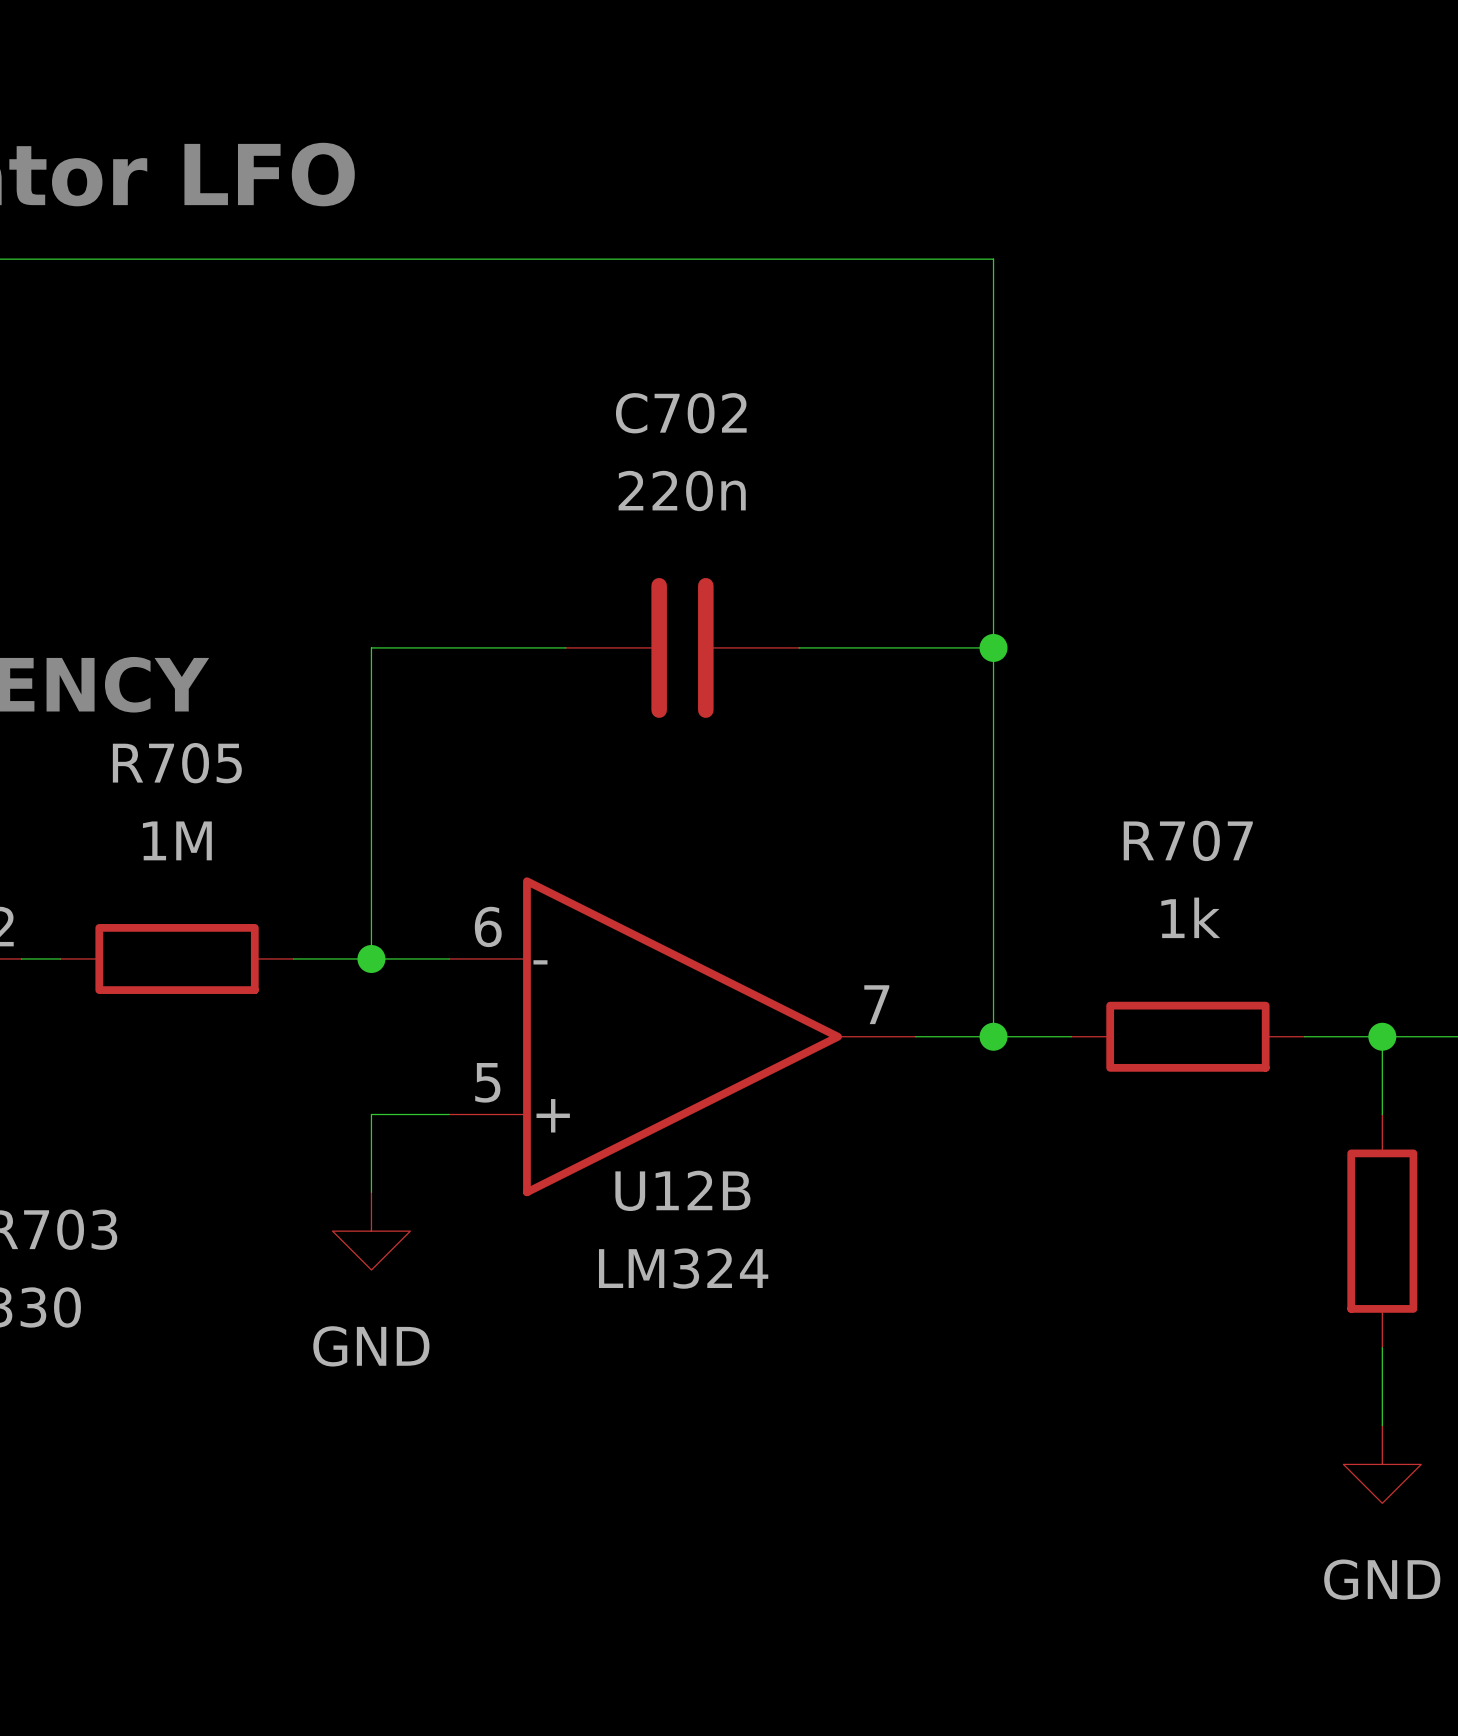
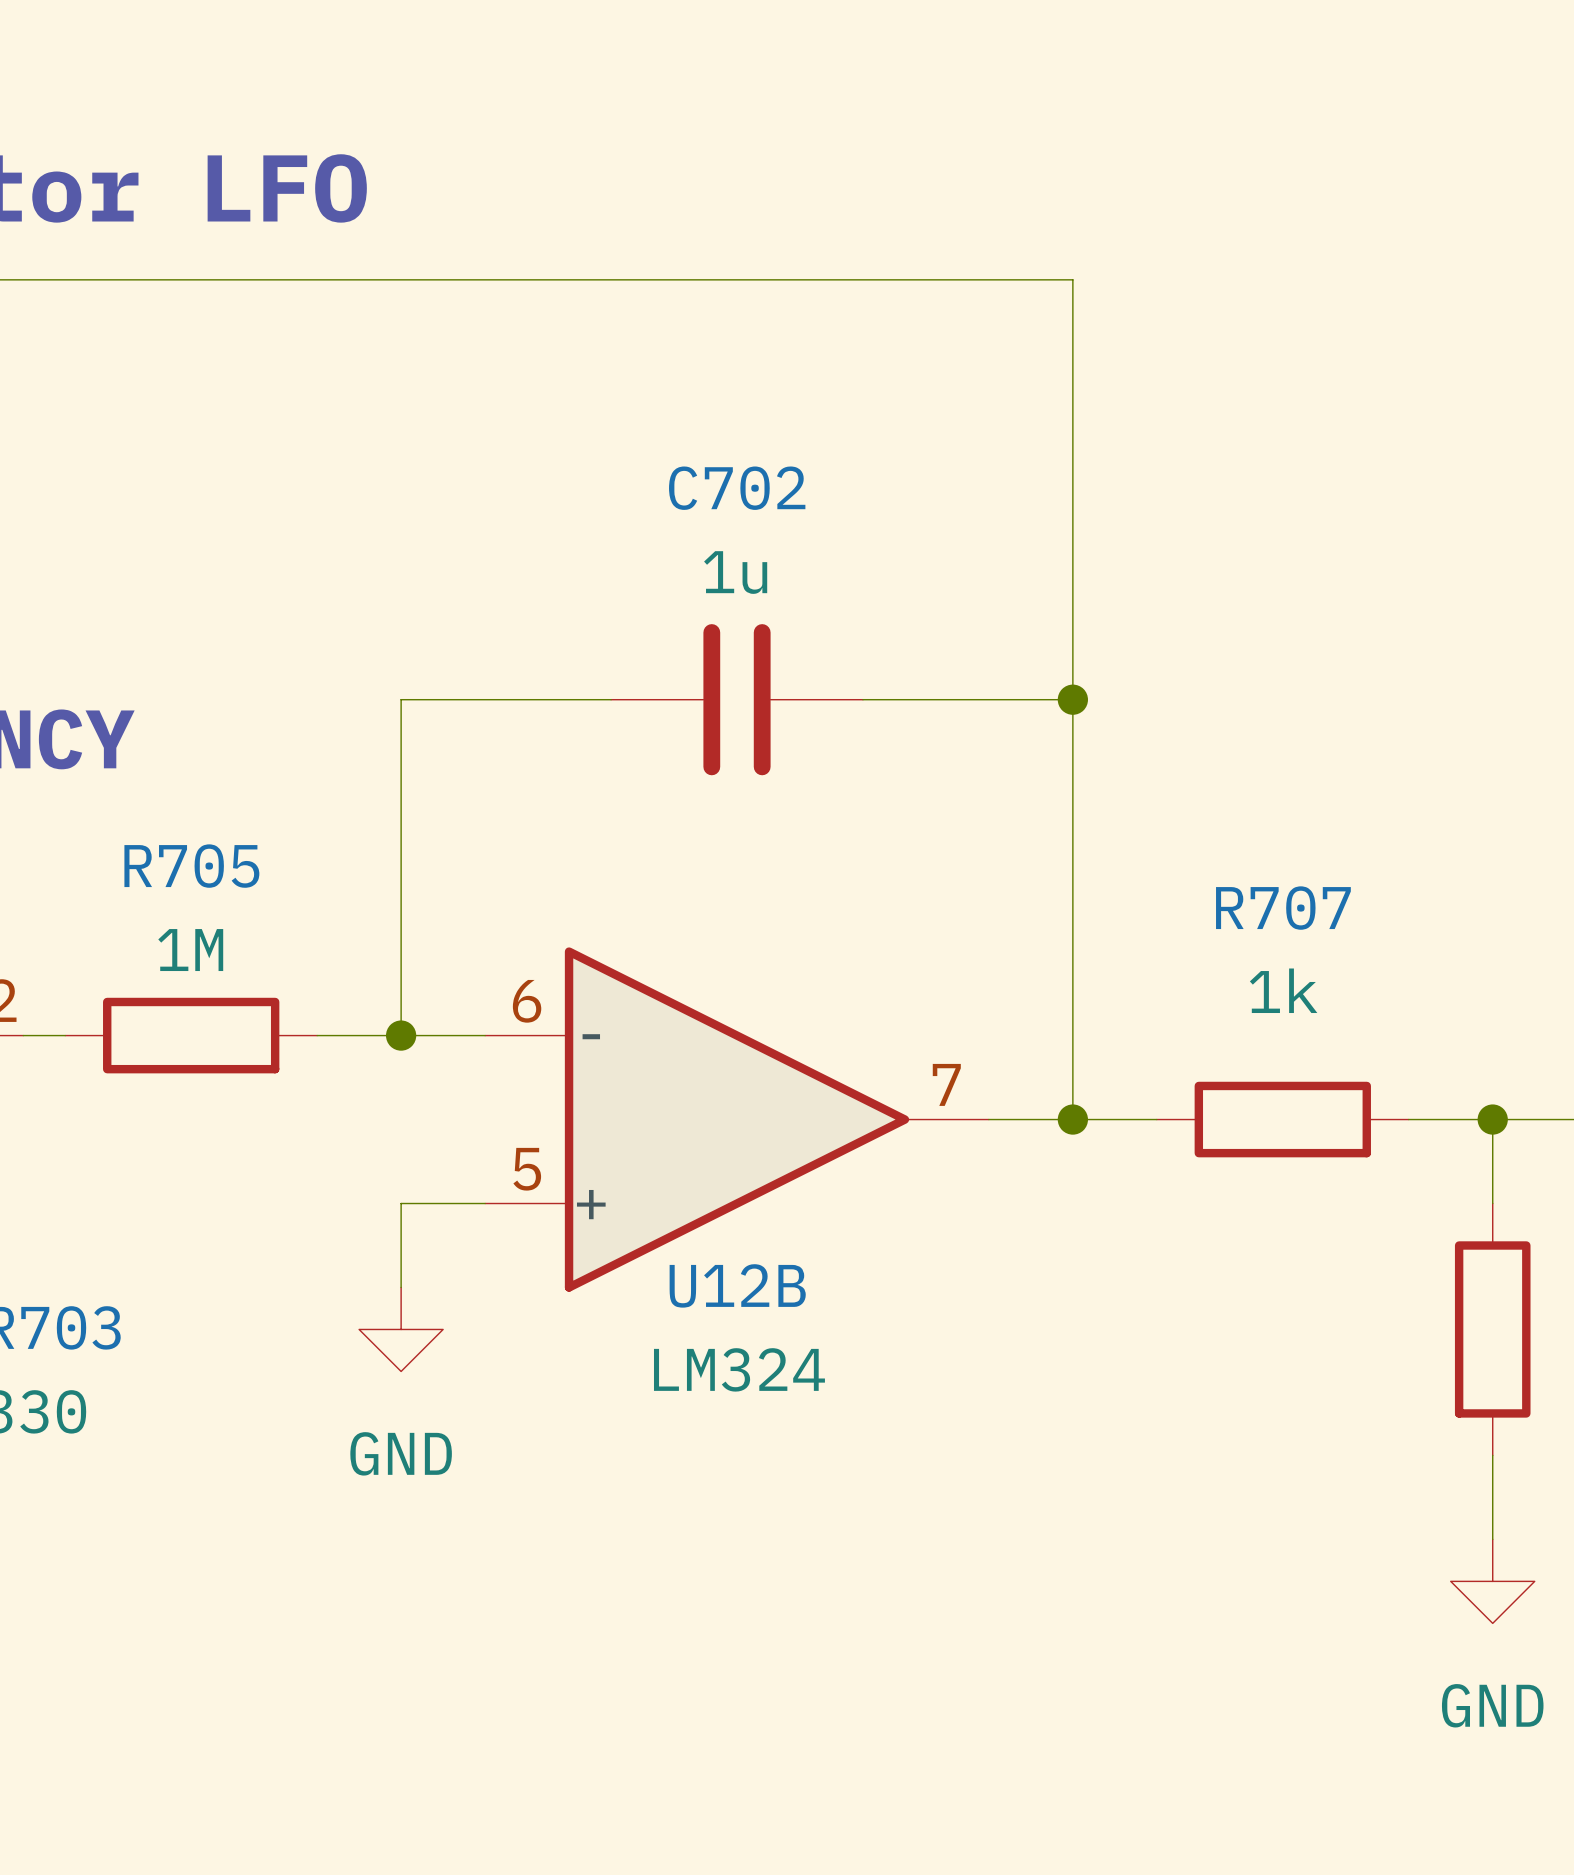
C702 name position: C702 (681, 413) -> C702 (737, 488)
C702 value: 220n (682, 491) -> 1u (735, 572)
R705 name position: R705 (177, 763) -> R705 (191, 866)
R705 value position: 1M (177, 840) -> 1M (190, 950)

